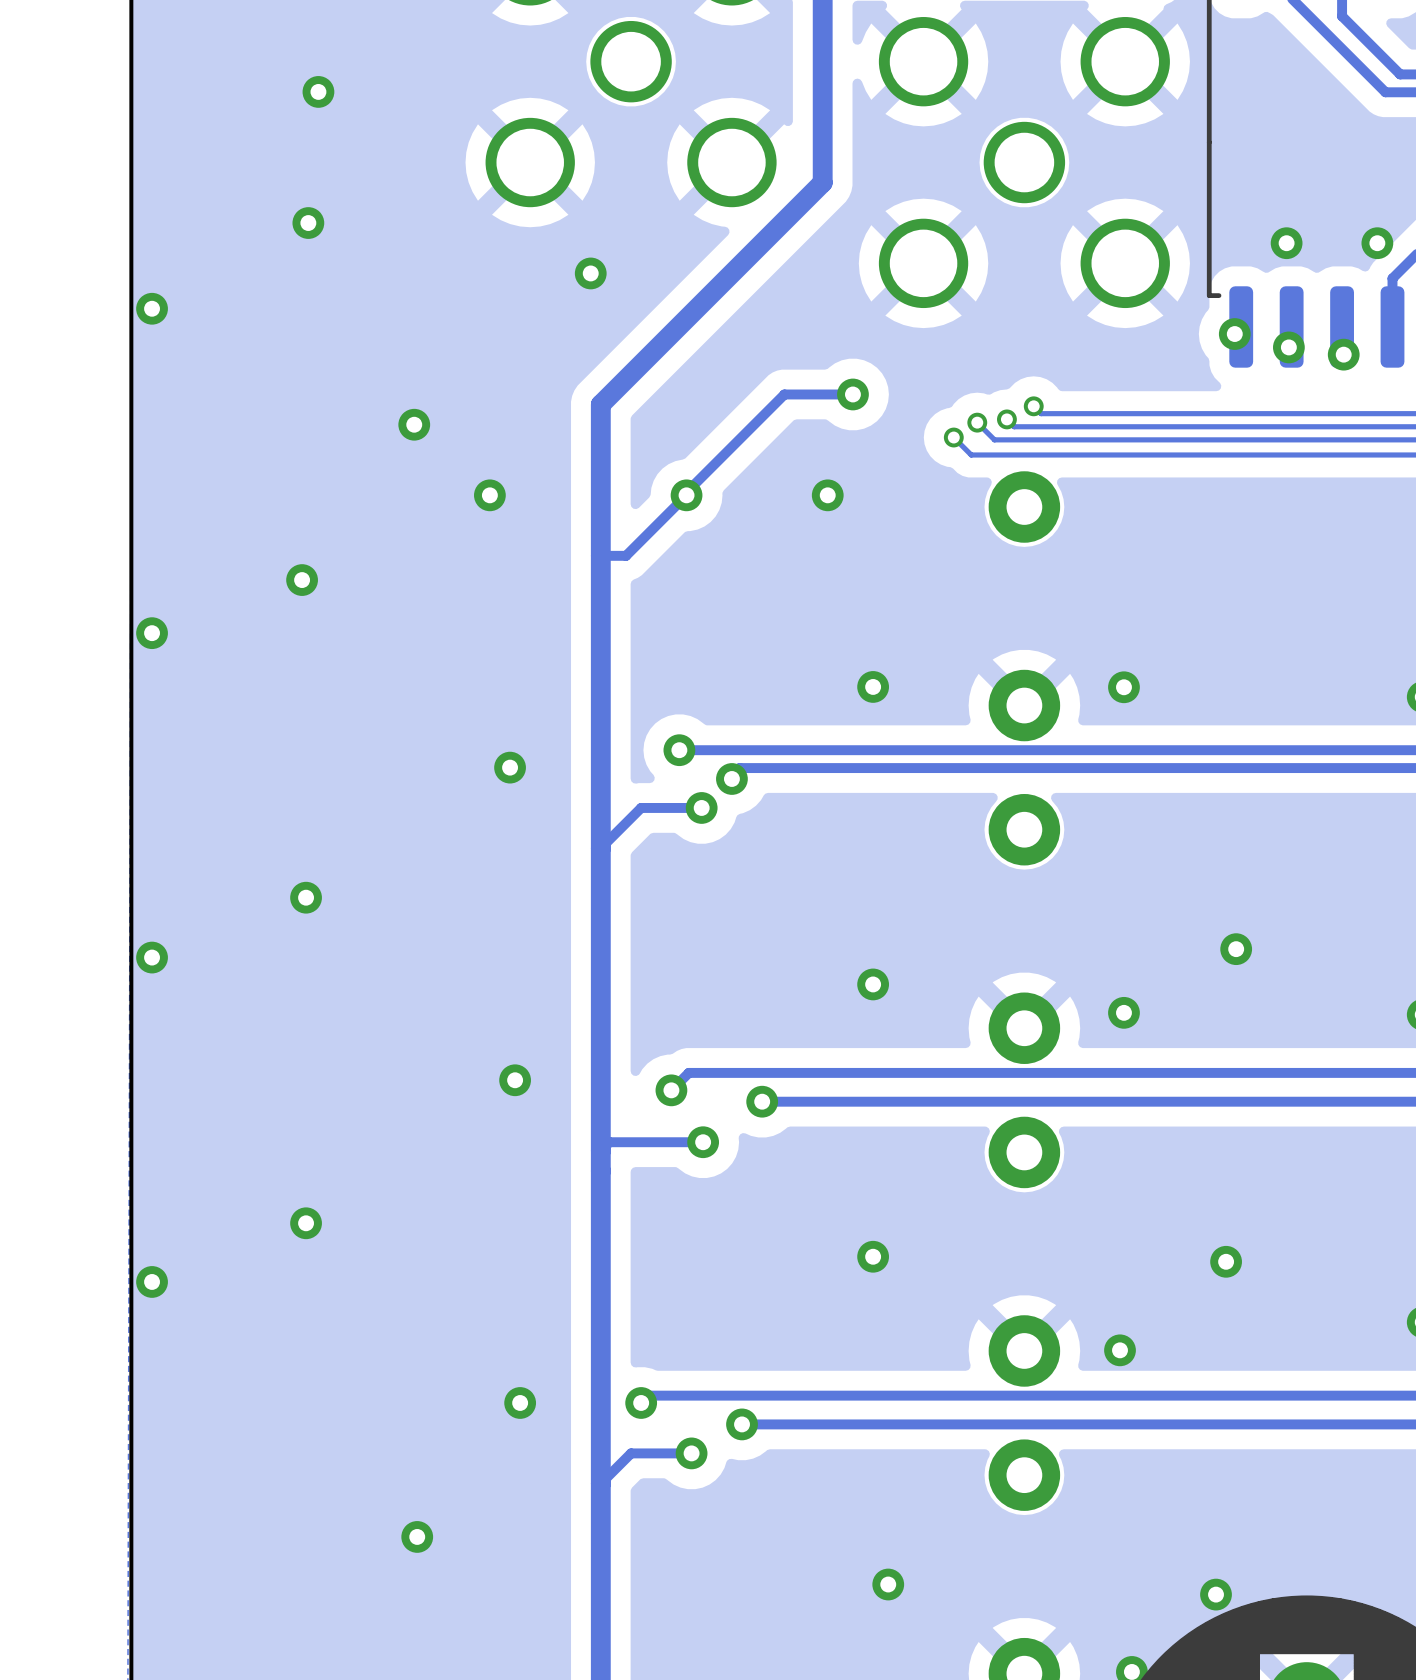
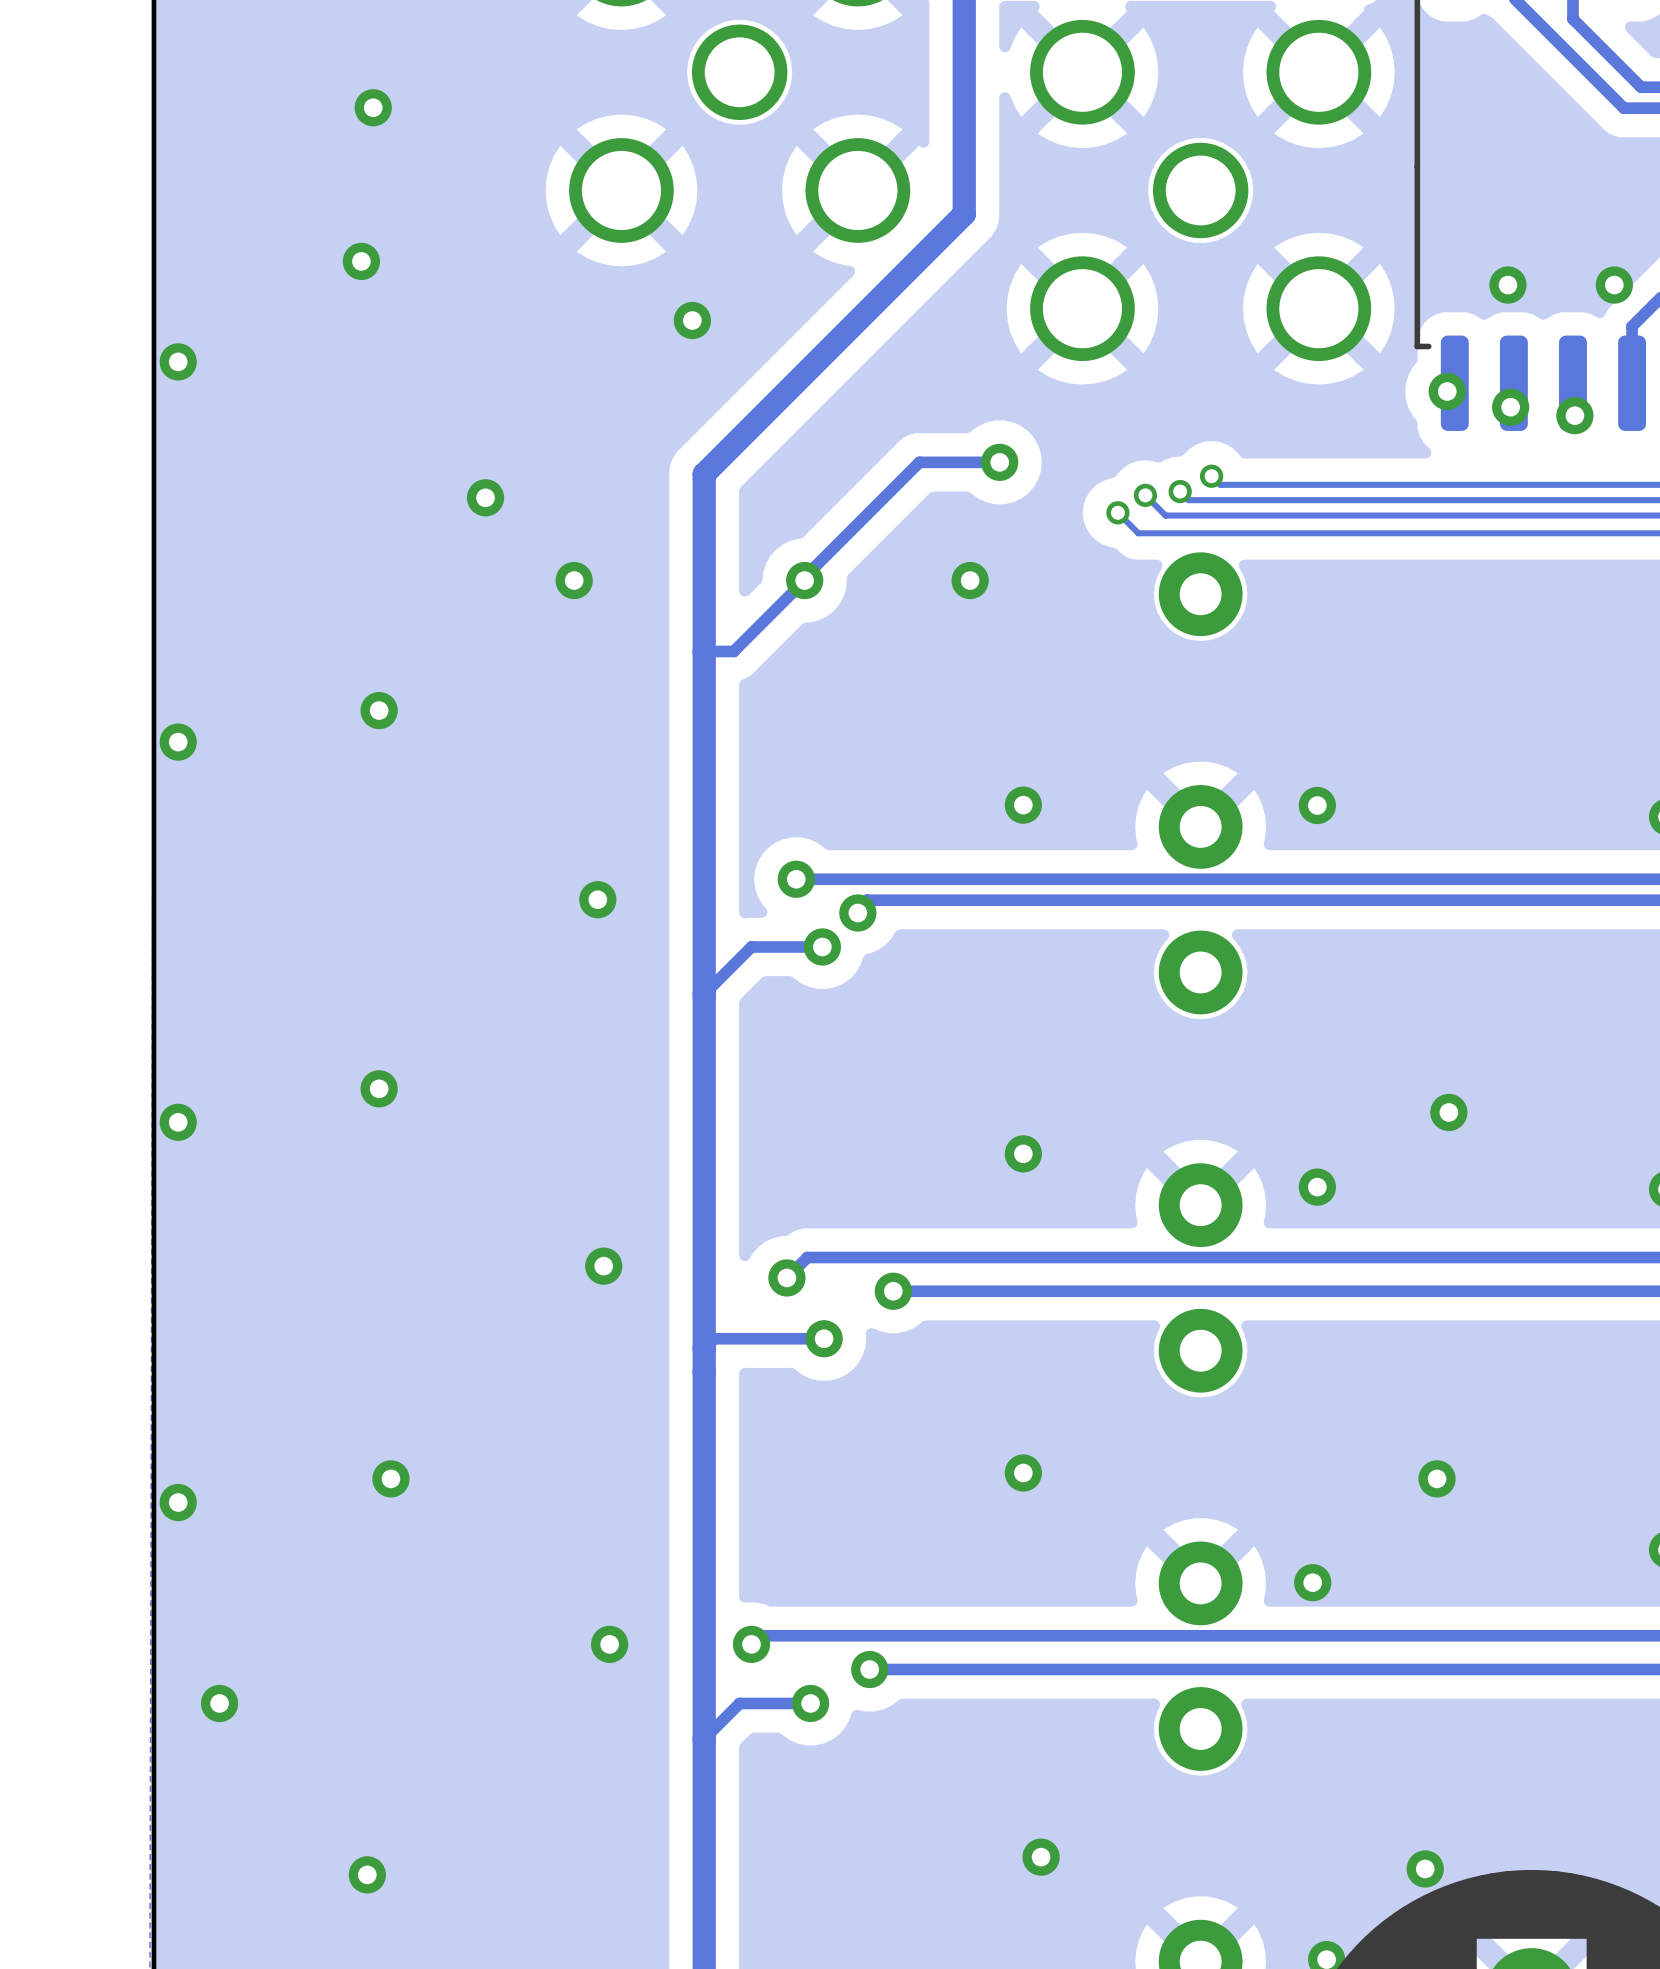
via position: (302, 580) -> (379, 710)
via position: (306, 897) -> (379, 1088)
via position: (306, 1223) -> (390, 1478)
via: none -> (219, 1703)
via: (417, 1536) -> none
via: none -> (367, 1874)

